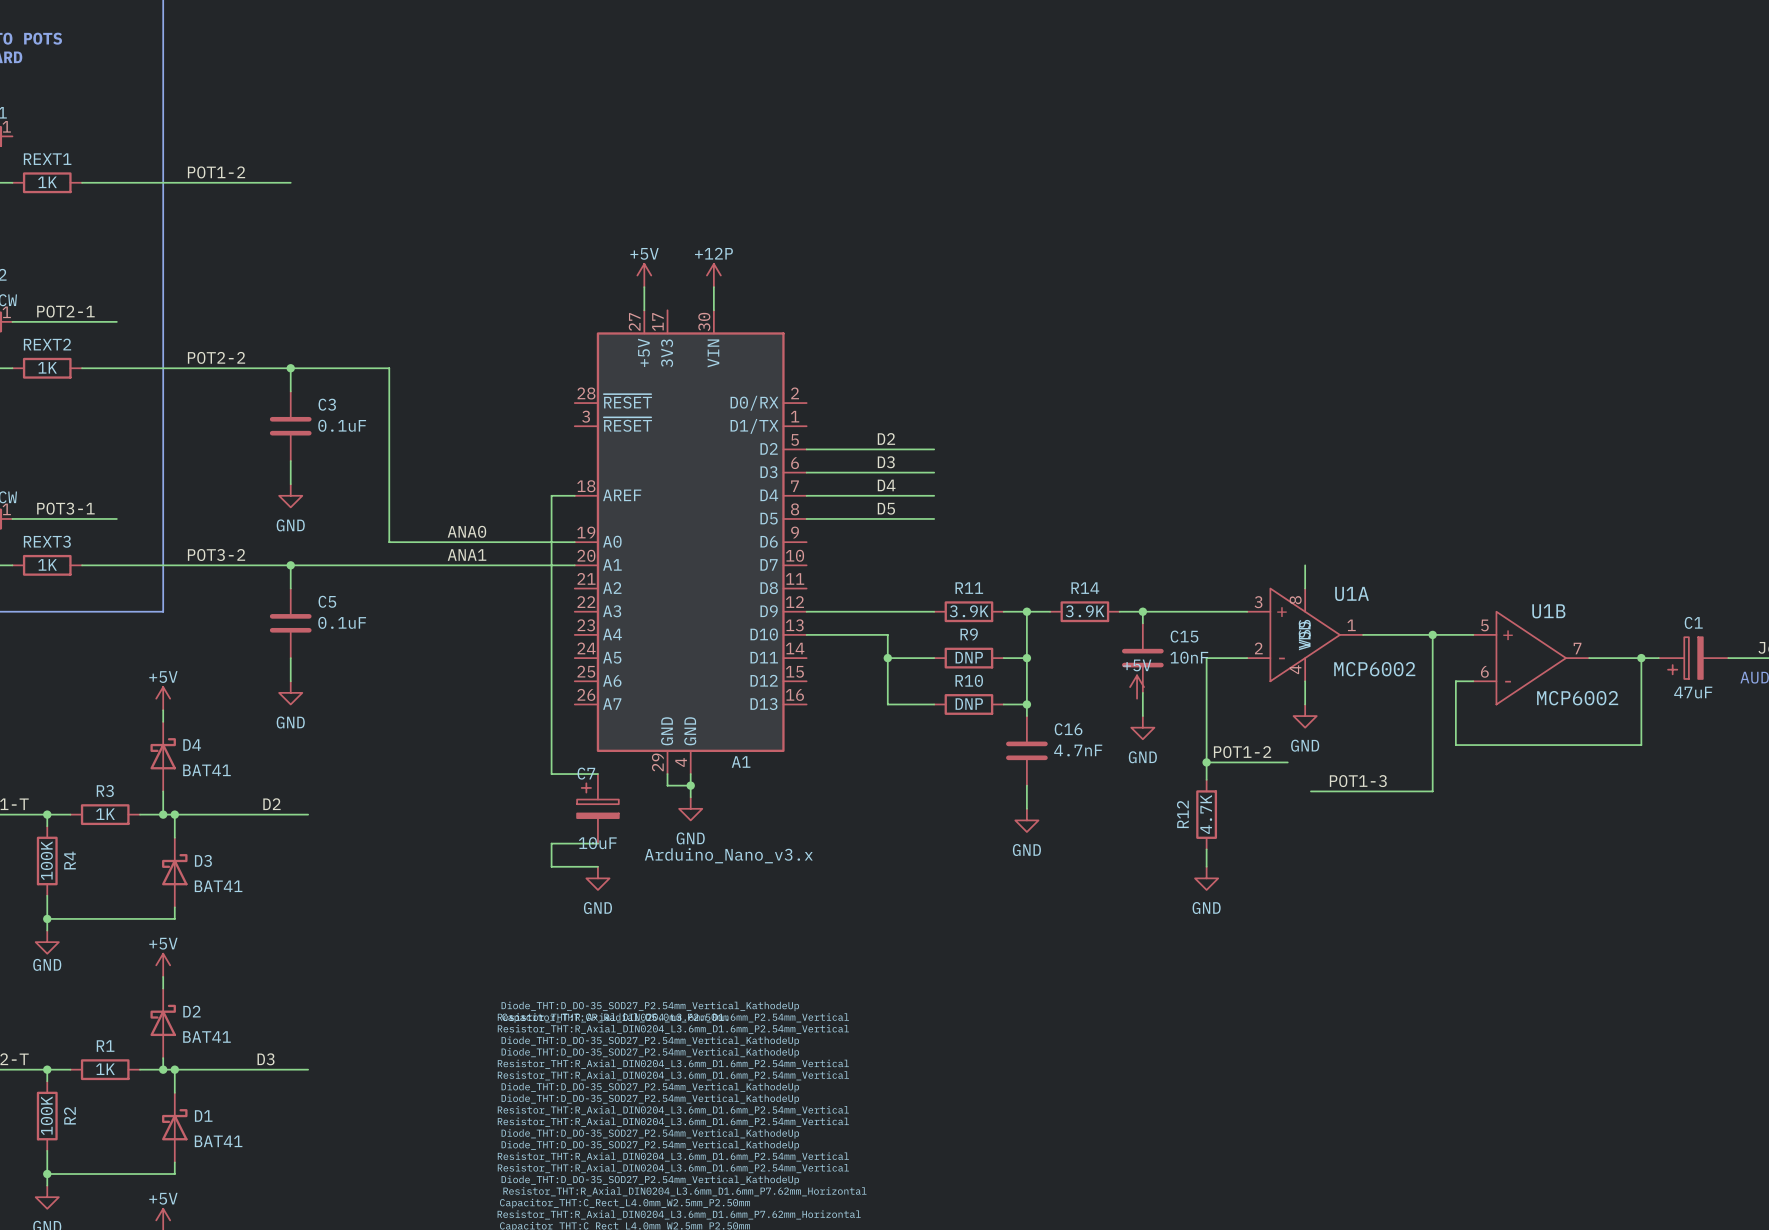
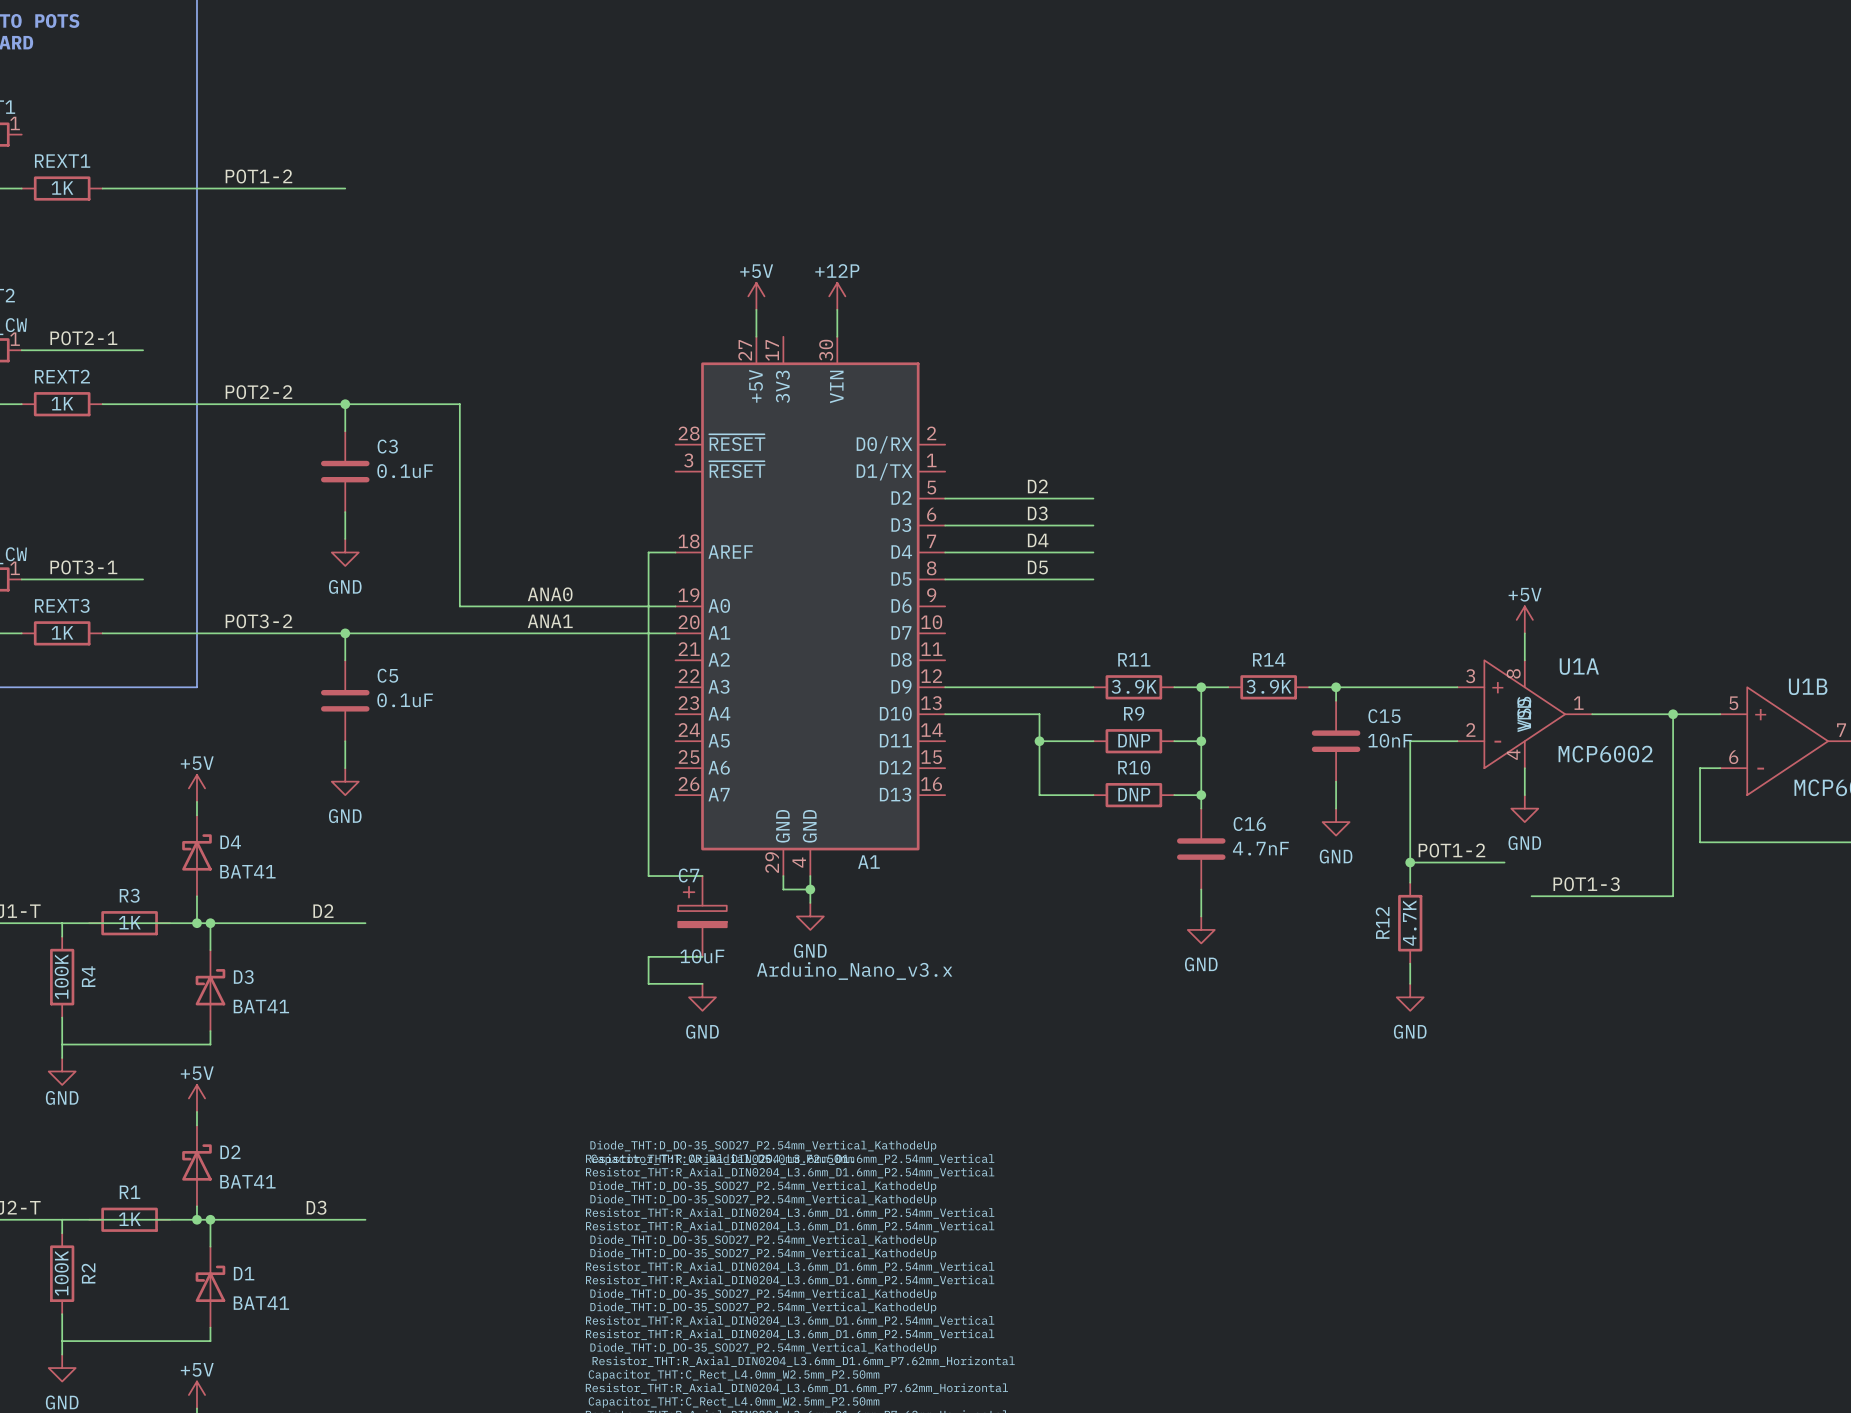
power symbol position: +5V (1137, 687) -> +5V (1524, 619)
junction: (47, 814) -> none
wire: none -> (89, 923) (170, 923)
junction: (47, 918) -> none
junction: (47, 1069) -> none
wire: none -> (89, 1219) (170, 1219)
junction: (47, 1174) -> none

